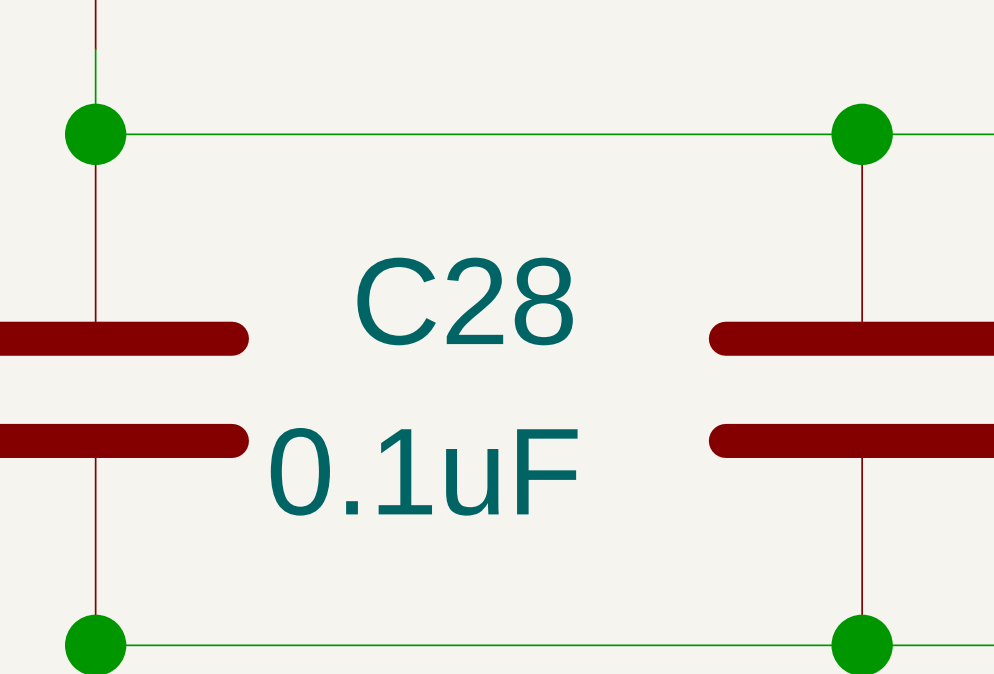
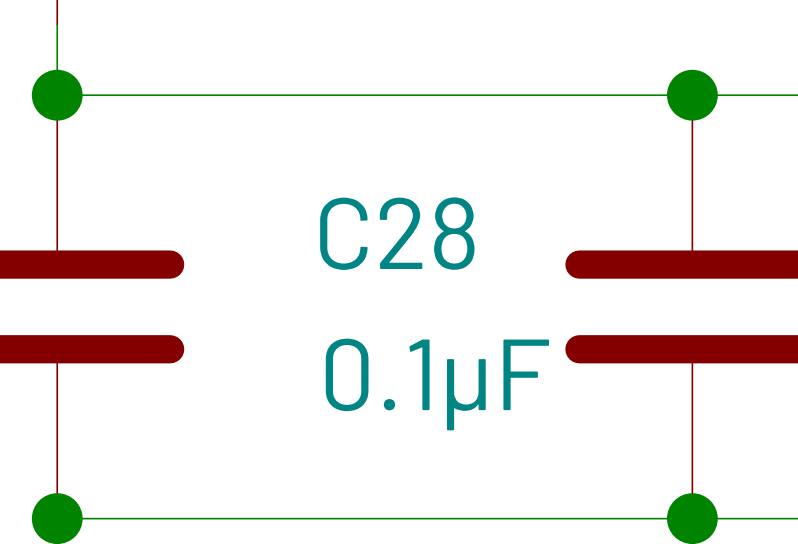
C28 name position: C28 (465, 301) -> C28 (397, 233)
C28 value: 0.1uF (424, 471) -> 0.1µF (437, 384)

